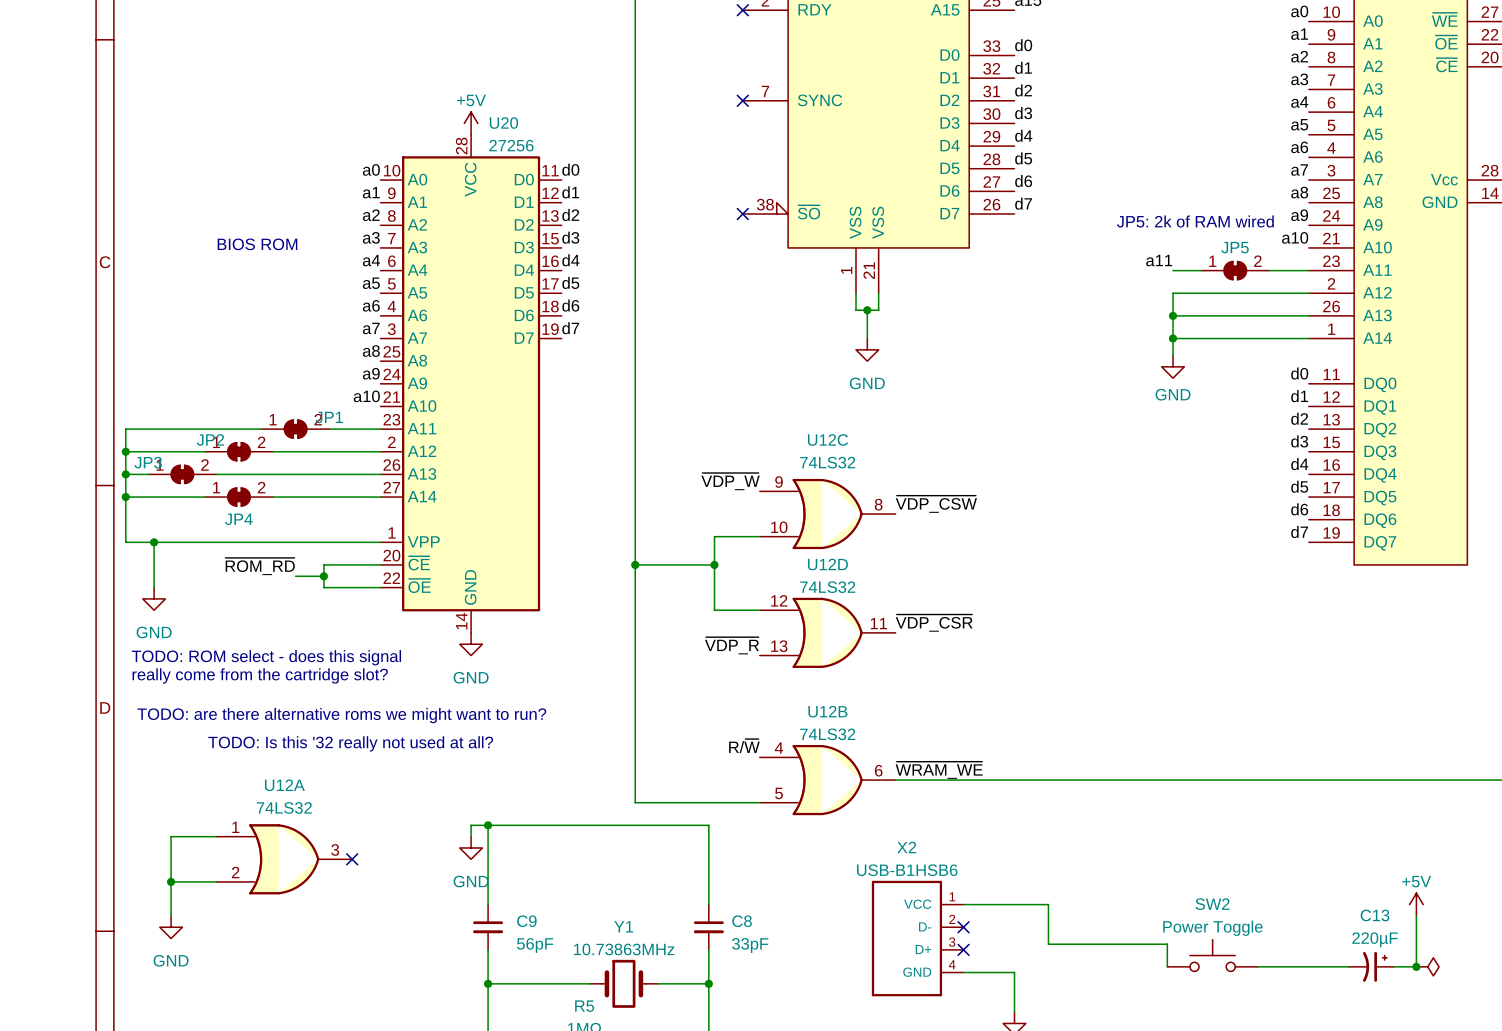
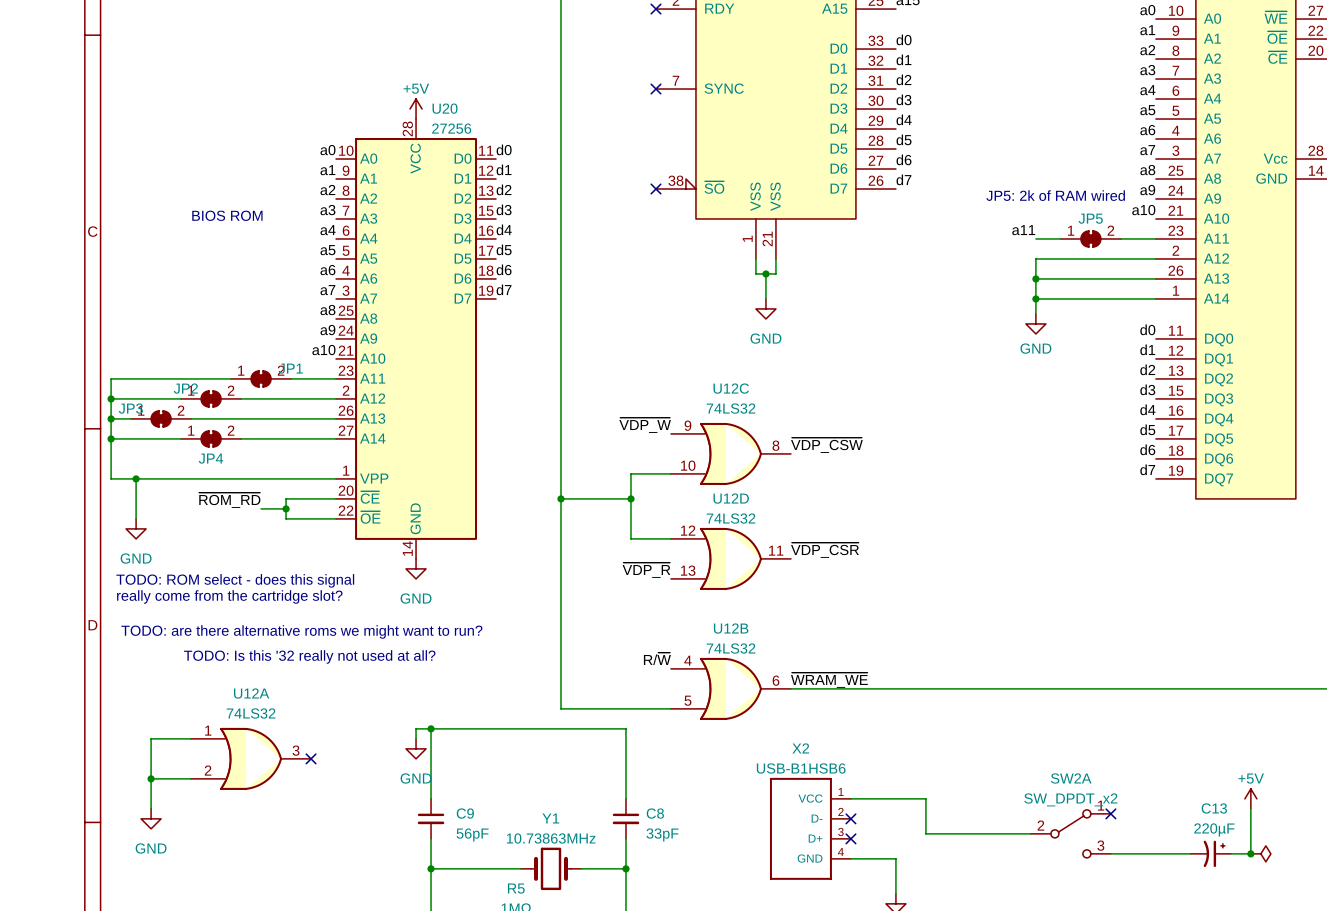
no-connect mark: none -> (1110, 813)
wire: (1167, 944) (1167, 966) -> none
SW2A: none -> SW_DPDT_x2 (1070, 833)
SW2: Power Toggle (1212, 955) -> none

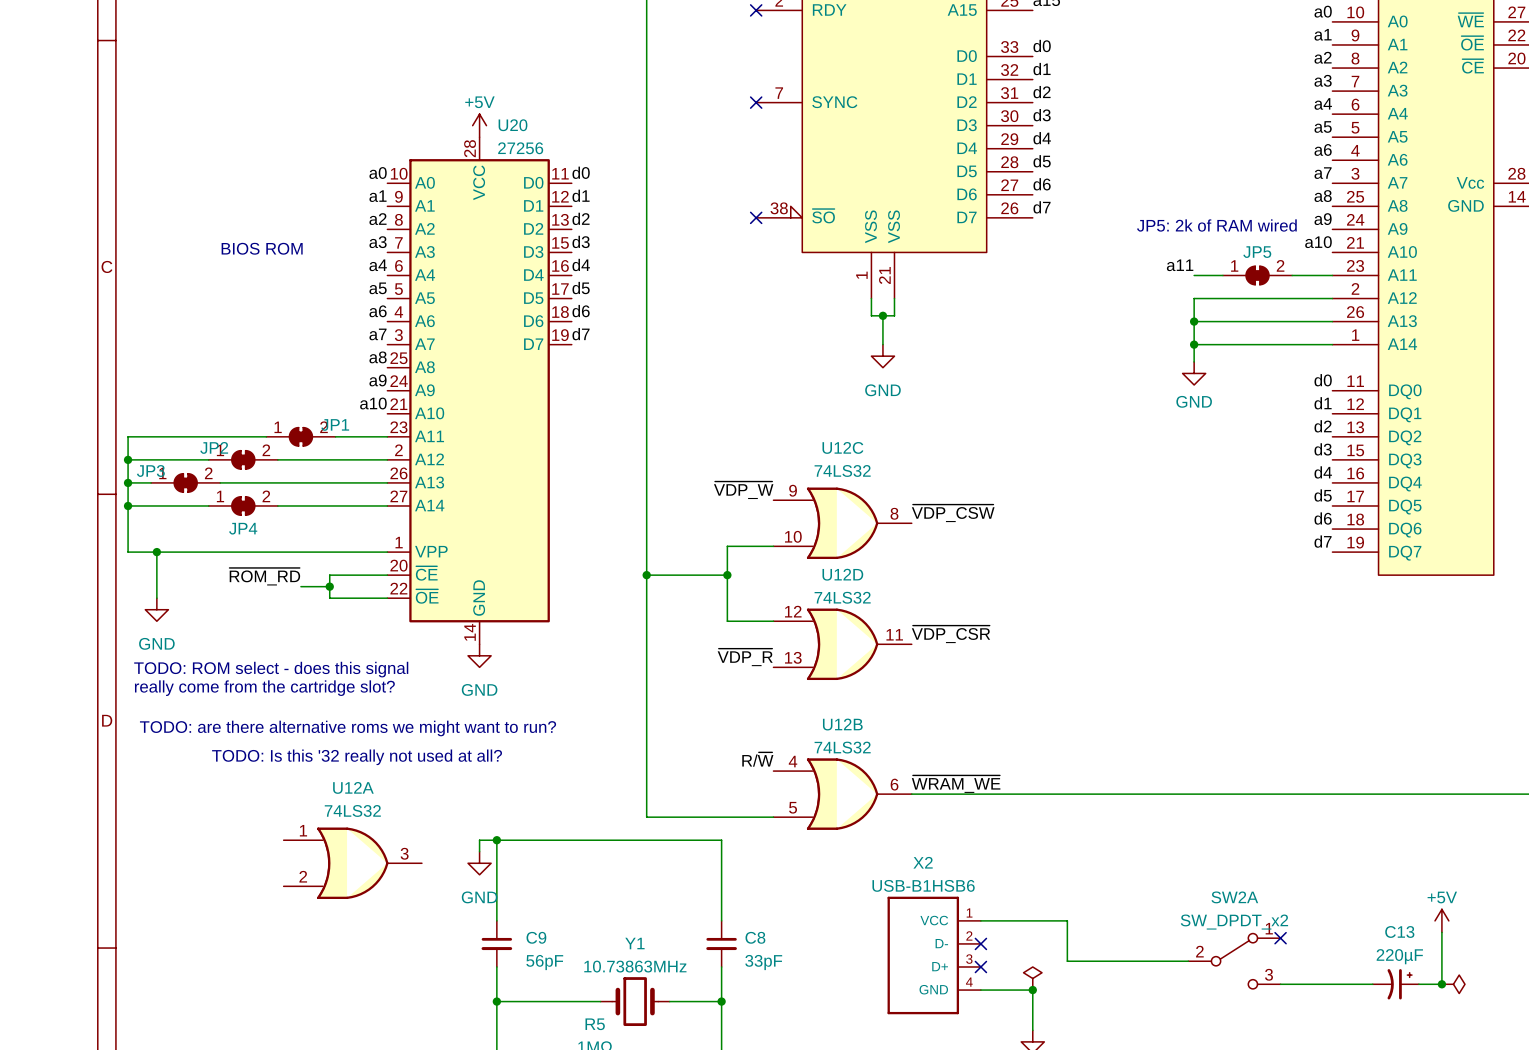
wire: (191, 738) (151, 738) (151, 808) -> none
U12A position: (251, 758) -> (352, 863)
no-connect mark: (311, 758) -> none
wire: (151, 778) (191, 778) -> none
junction: (151, 778) -> none
power symbol: GND (151, 818) -> none
power symbol: none -> (1032, 978)
junction: none -> (1032, 990)

